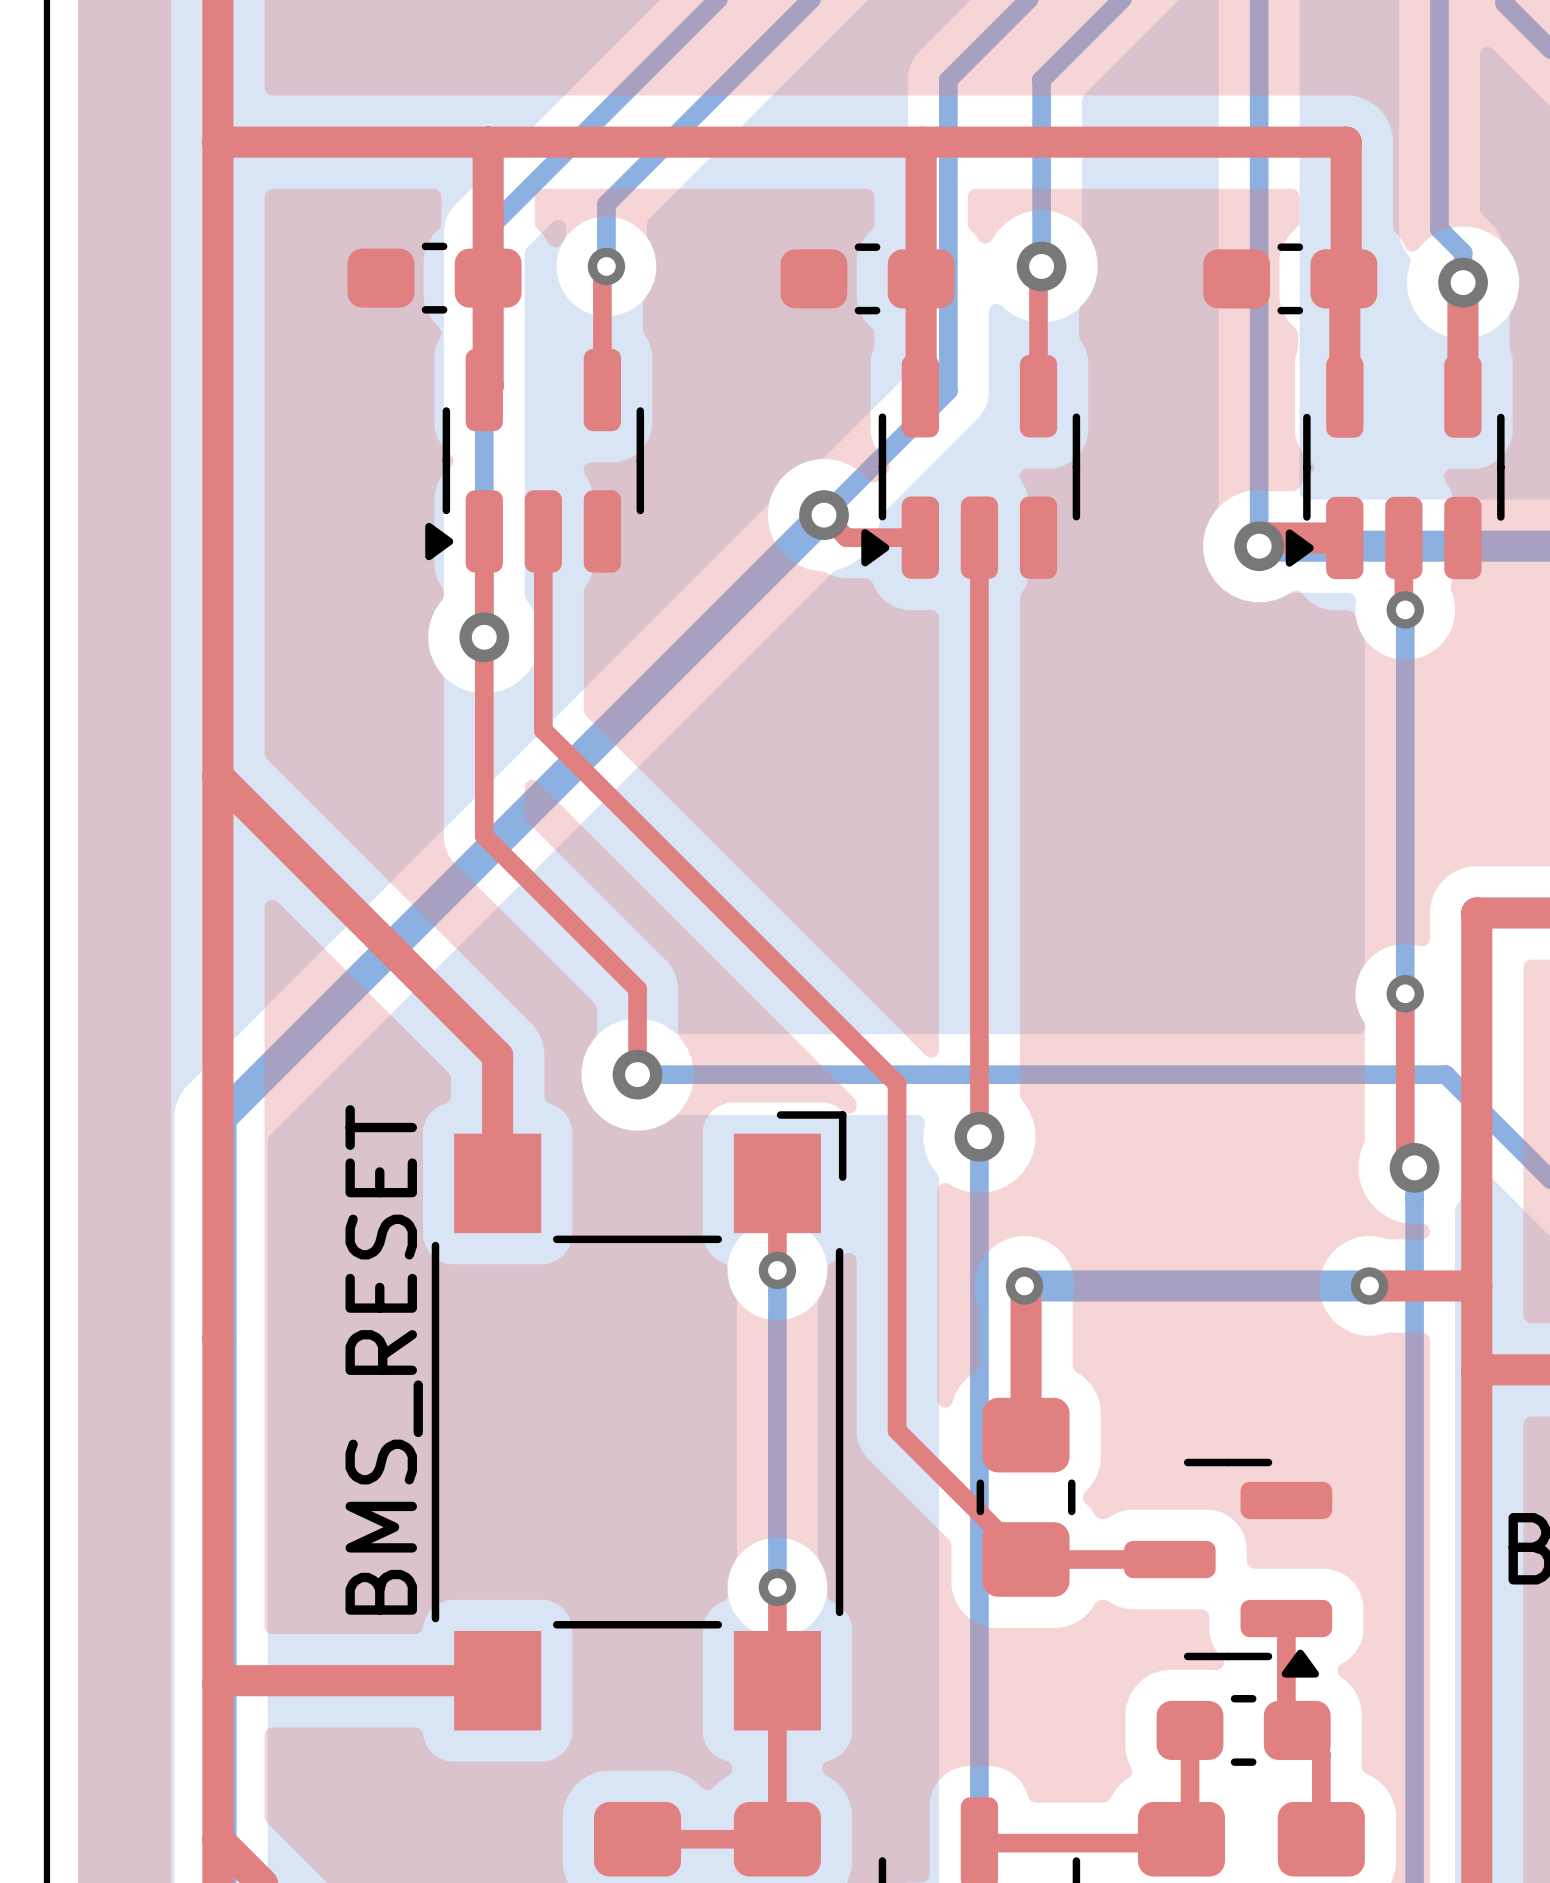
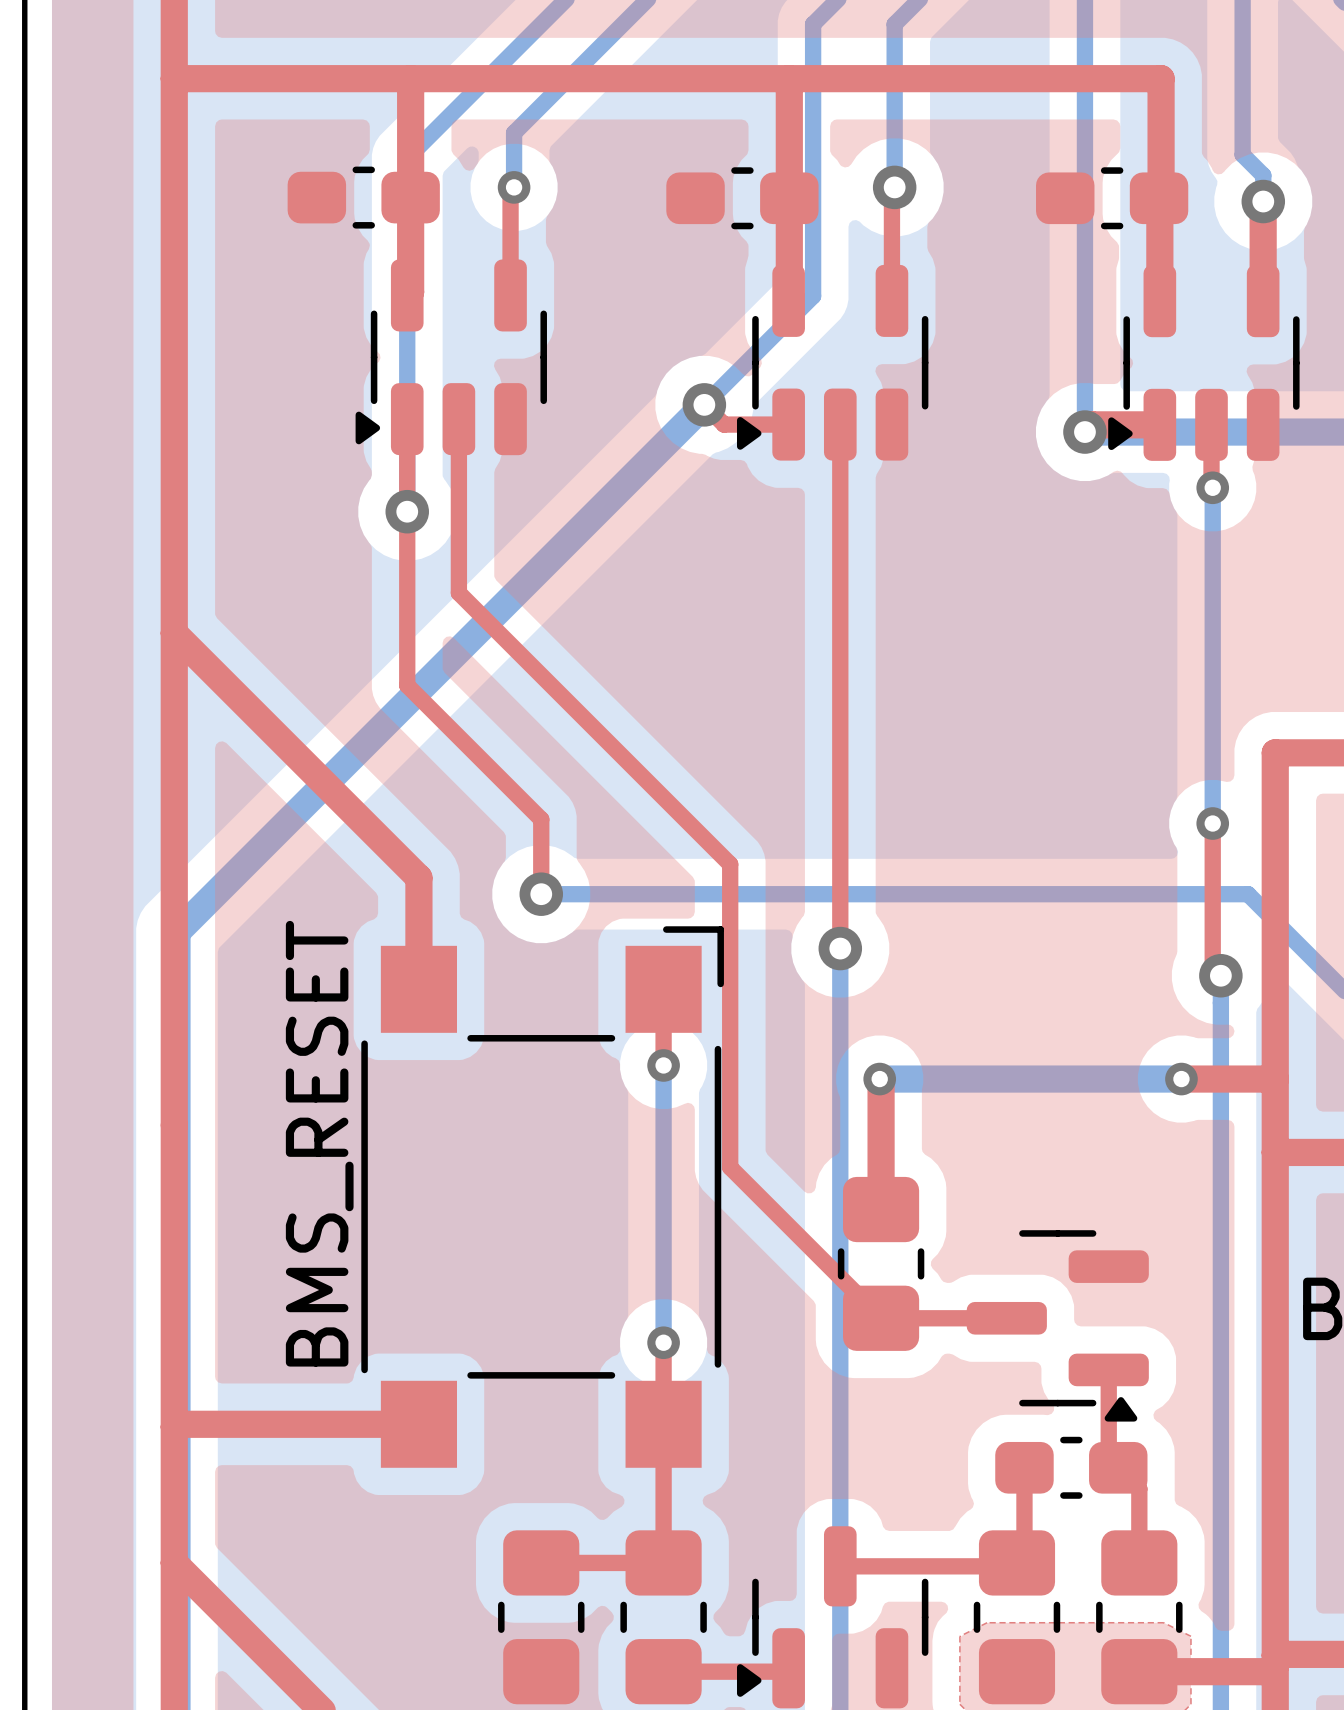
top track: (853, 1040) (897, 1083) (897, 1430) -> (730, 864) (730, 1167) (768, 1205)

